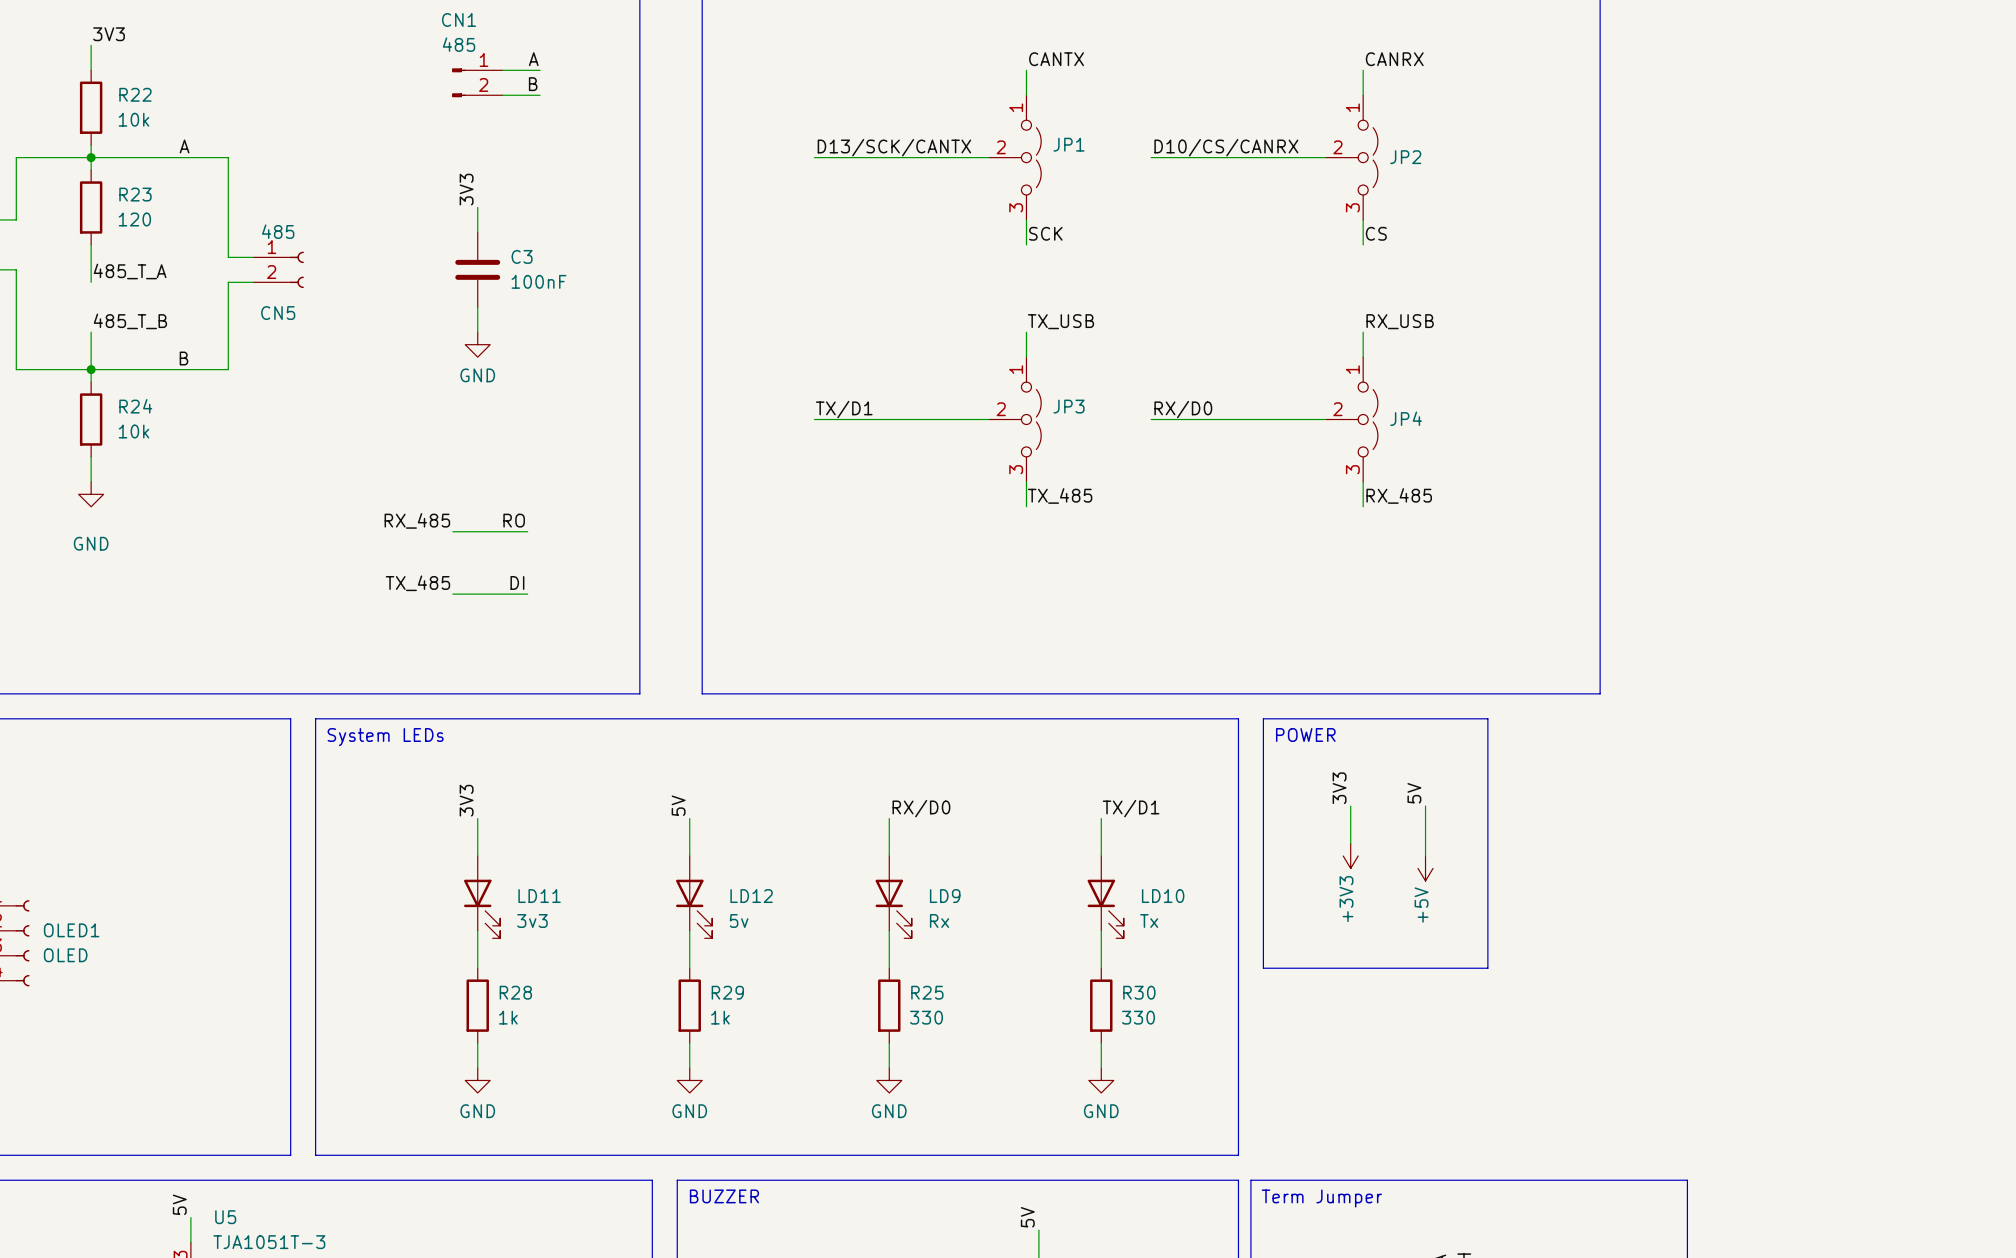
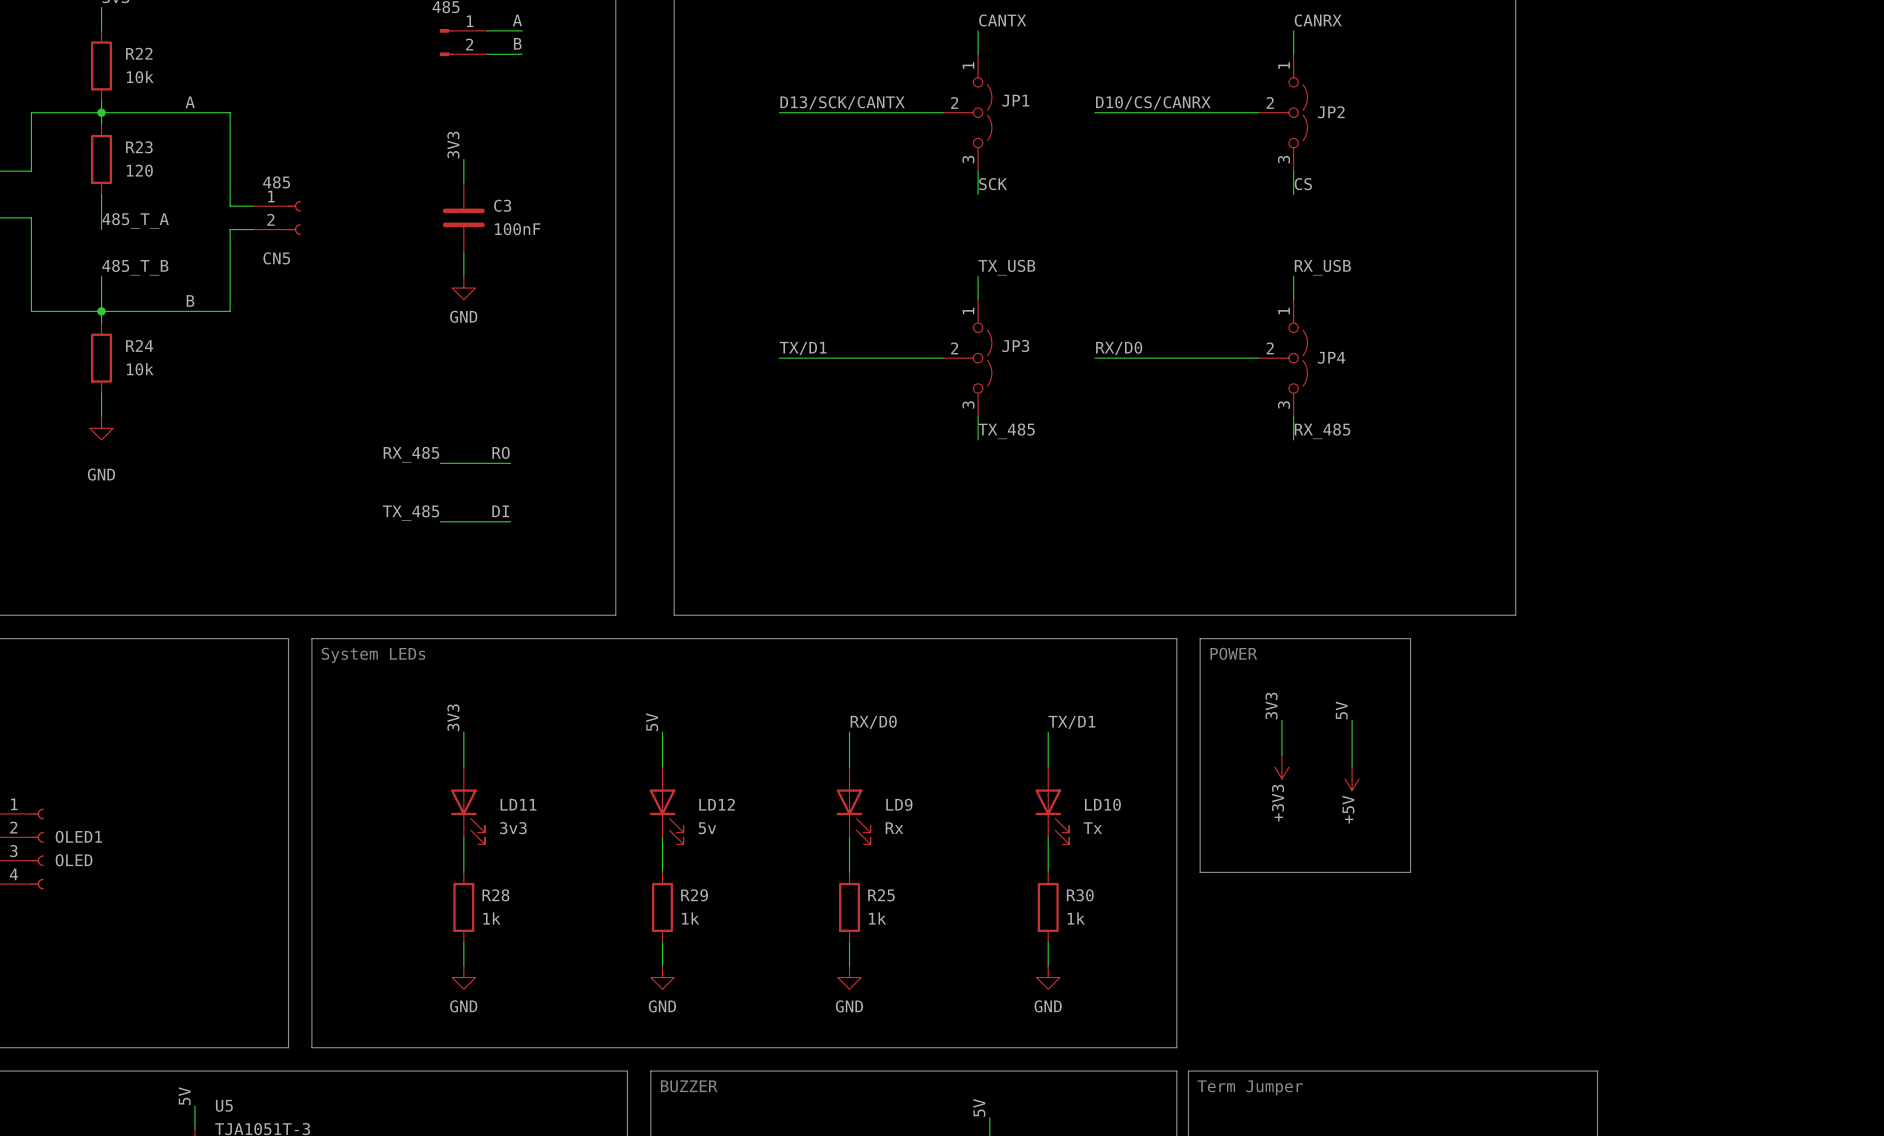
R25 value: 330 (926, 1017) -> 1k (877, 918)
R30 value: 330 (1138, 1017) -> 1k (1076, 918)

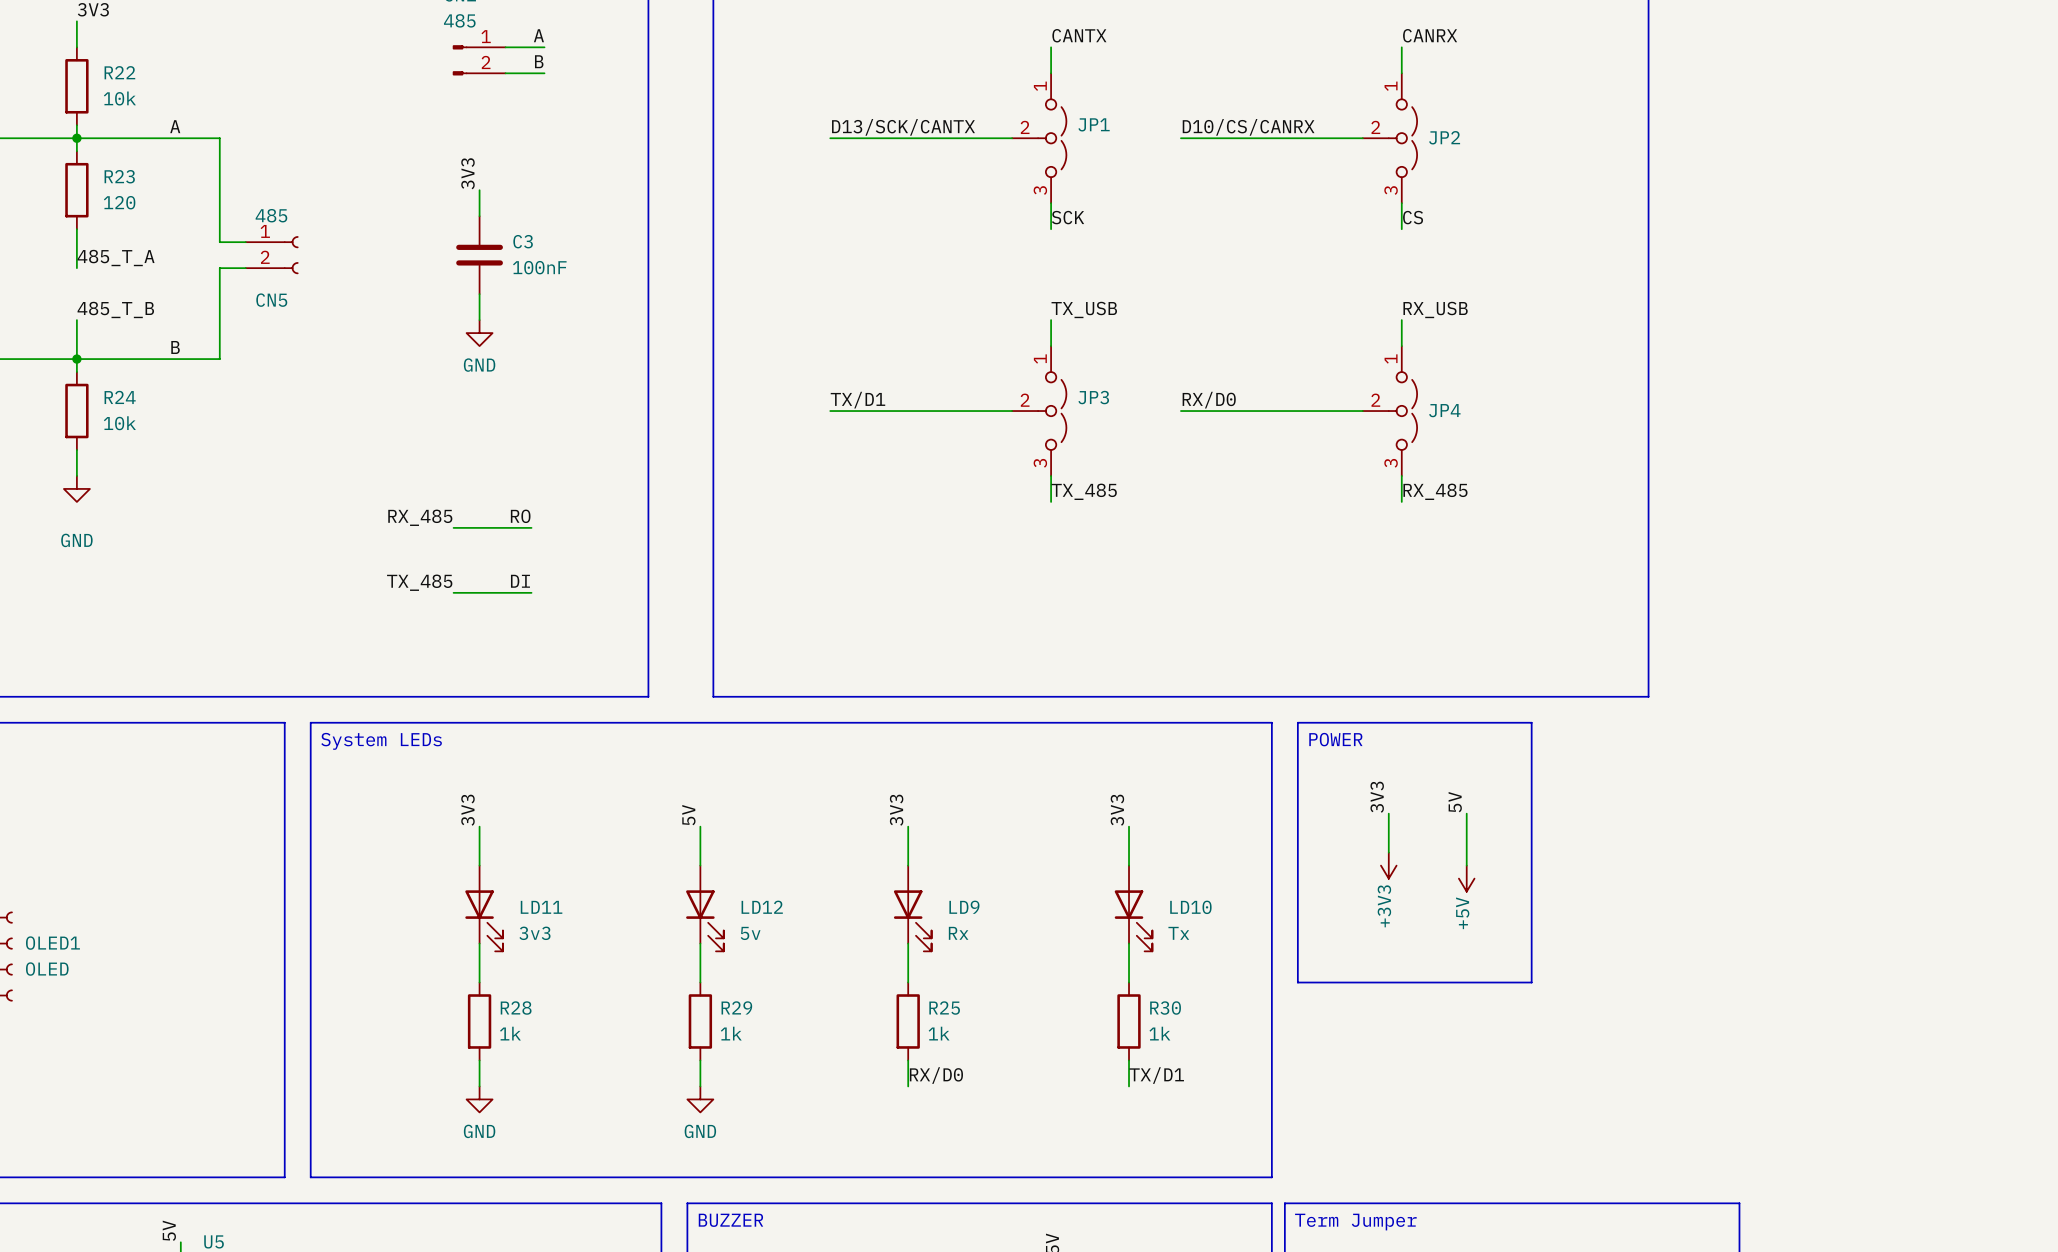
label: RX/D0 (873, 722) -> 3V3 (896, 810)
label: TX/D1 (1071, 722) -> 3V3 (1117, 810)
label: none -> RX/D0 (936, 1075)
label: none -> TX/D1 (1156, 1075)
power symbol: GND (849, 977) -> none
power symbol: GND (1048, 977) -> none

